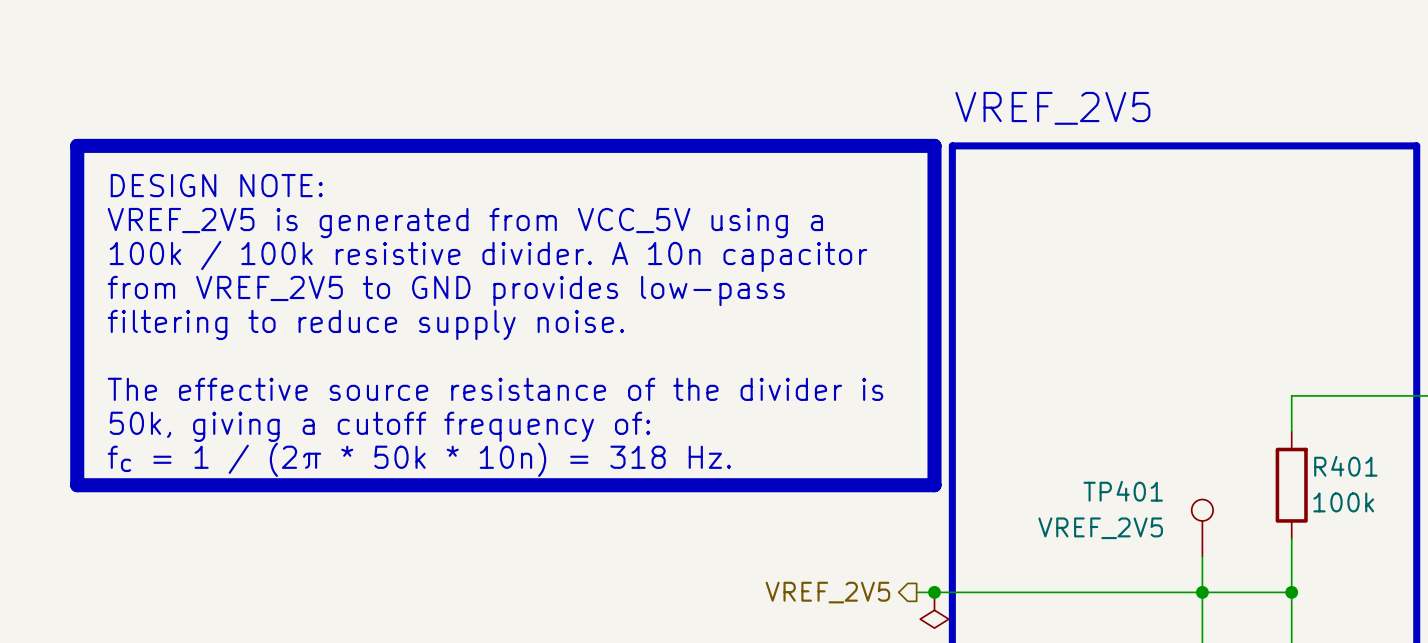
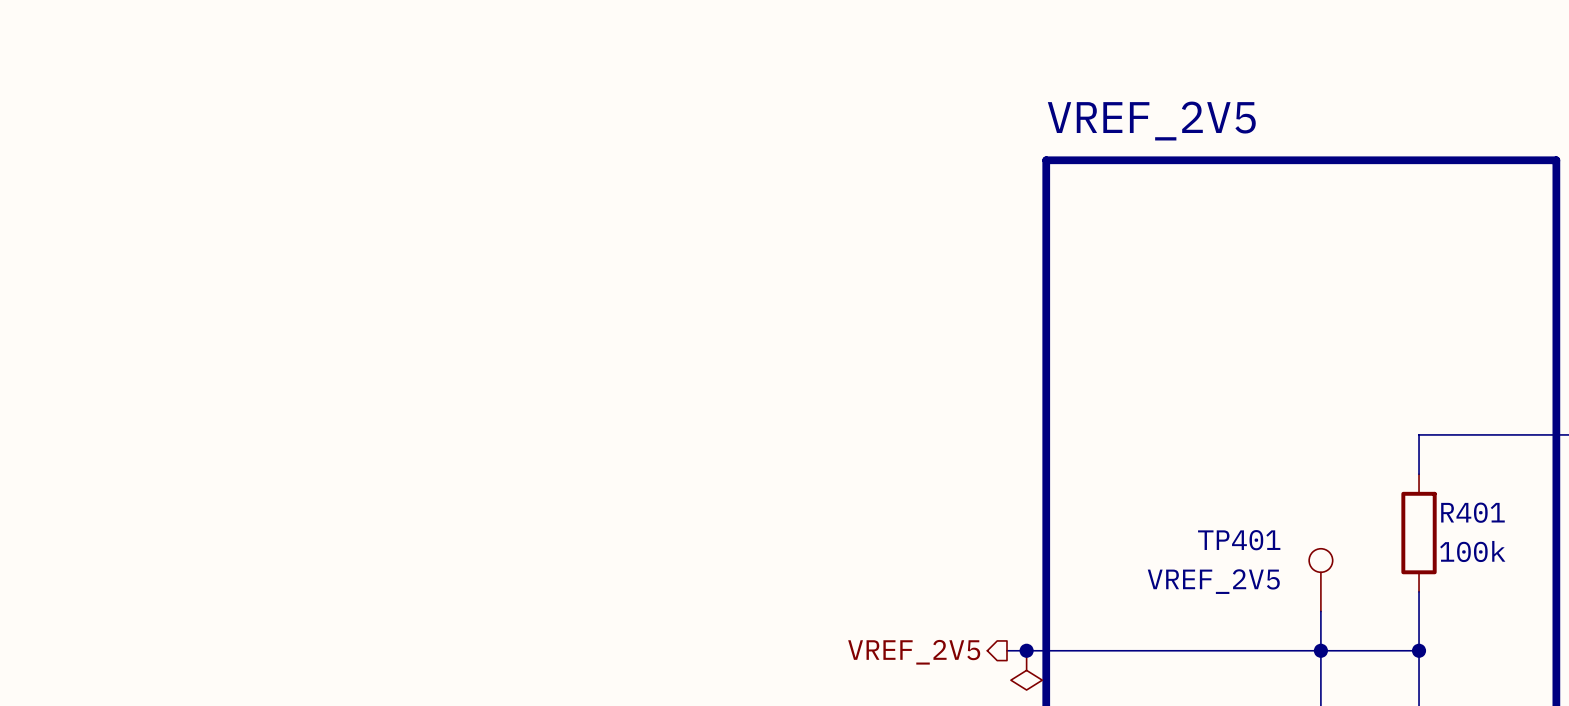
line: (77, 145) (934, 145) (934, 485) (77, 485) (77, 145) -> none
text: DESIGN NOTE: (216, 185) -> none
text: VREF_2V5 is generated from VCC_5V using a (465, 223) -> none
text: 100k / 100k resistive divider. A 10n capacitor (488, 256) -> none
text: from VREF_2V5 to GND provides low-pass (446, 290) -> none
text: filtering to reduce supply noise. (365, 324) -> none
text: The effective source resistance of the divider is (495, 389) -> none
text: 50k, giving a cutoff frequency of: (379, 426) -> none
text: fc = 1 / (2π * 50k * 10n) = 318 Hz. (419, 459) -> none

